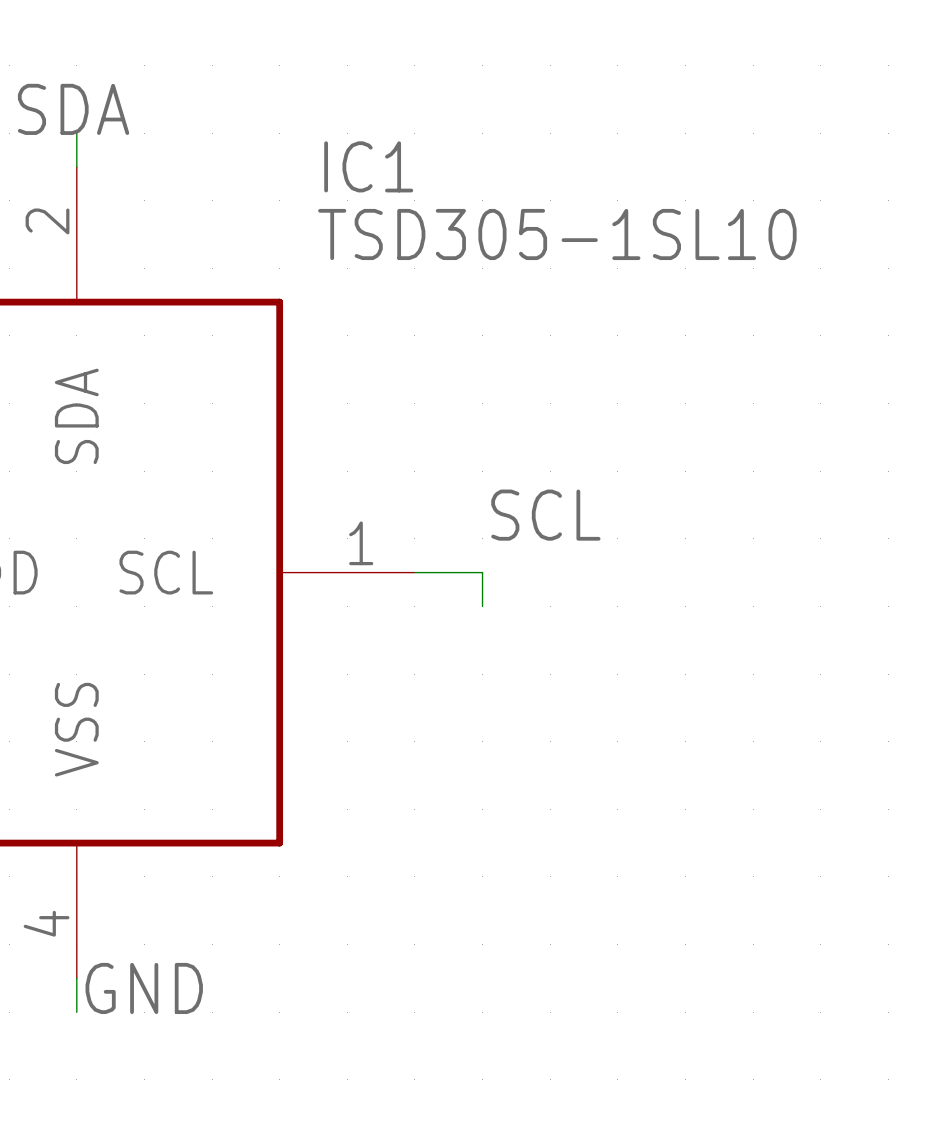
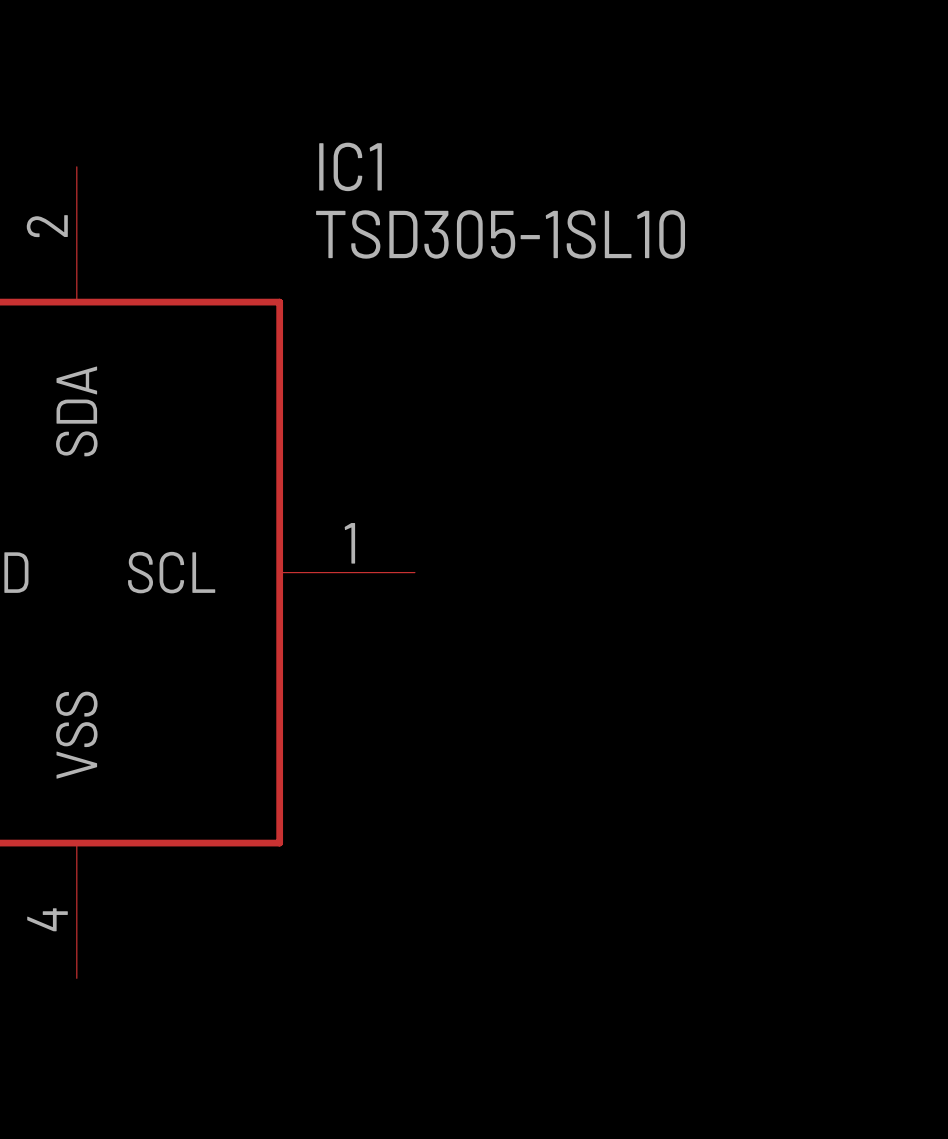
label: SDA (73, 109) -> none
wire: (76, 133) (76, 166) -> none
label: SCL (545, 515) -> none
wire: (414, 572) (482, 572) (482, 606) -> none
wire: (76, 978) (76, 1012) -> none
label: GND (144, 988) -> none

